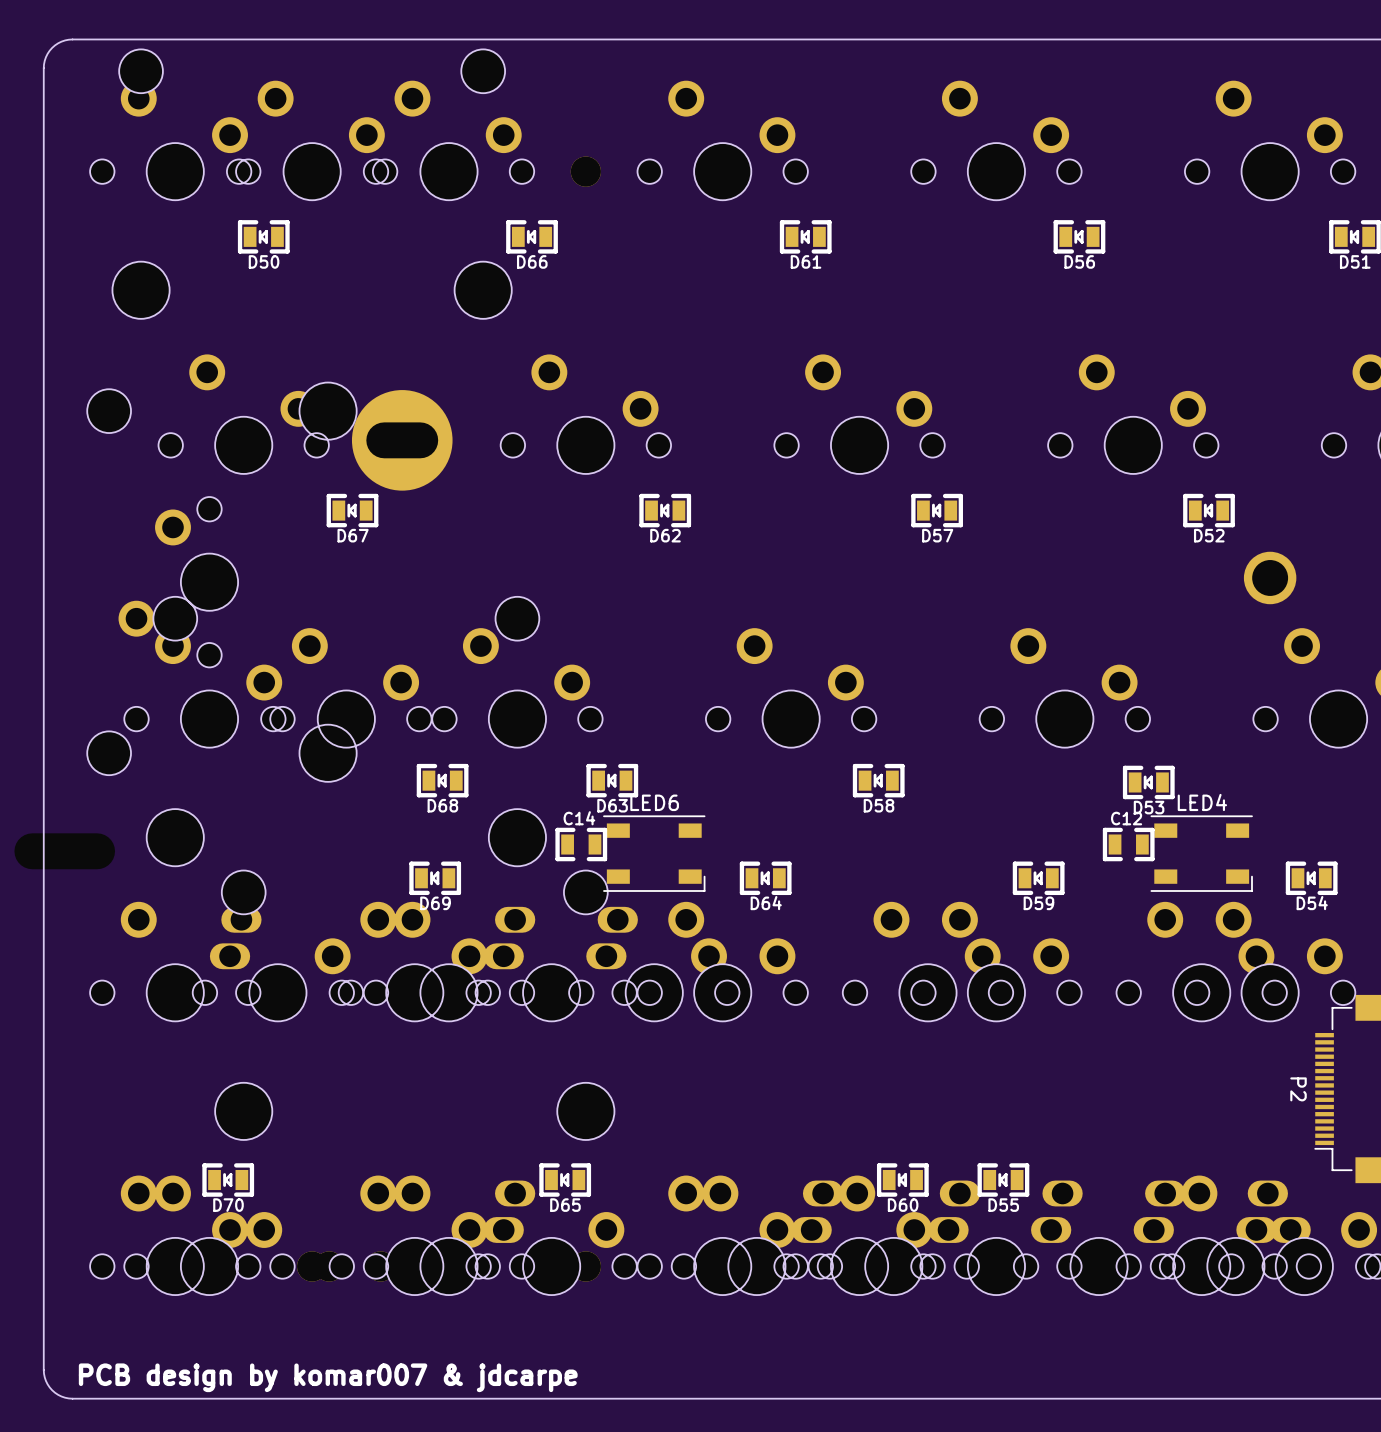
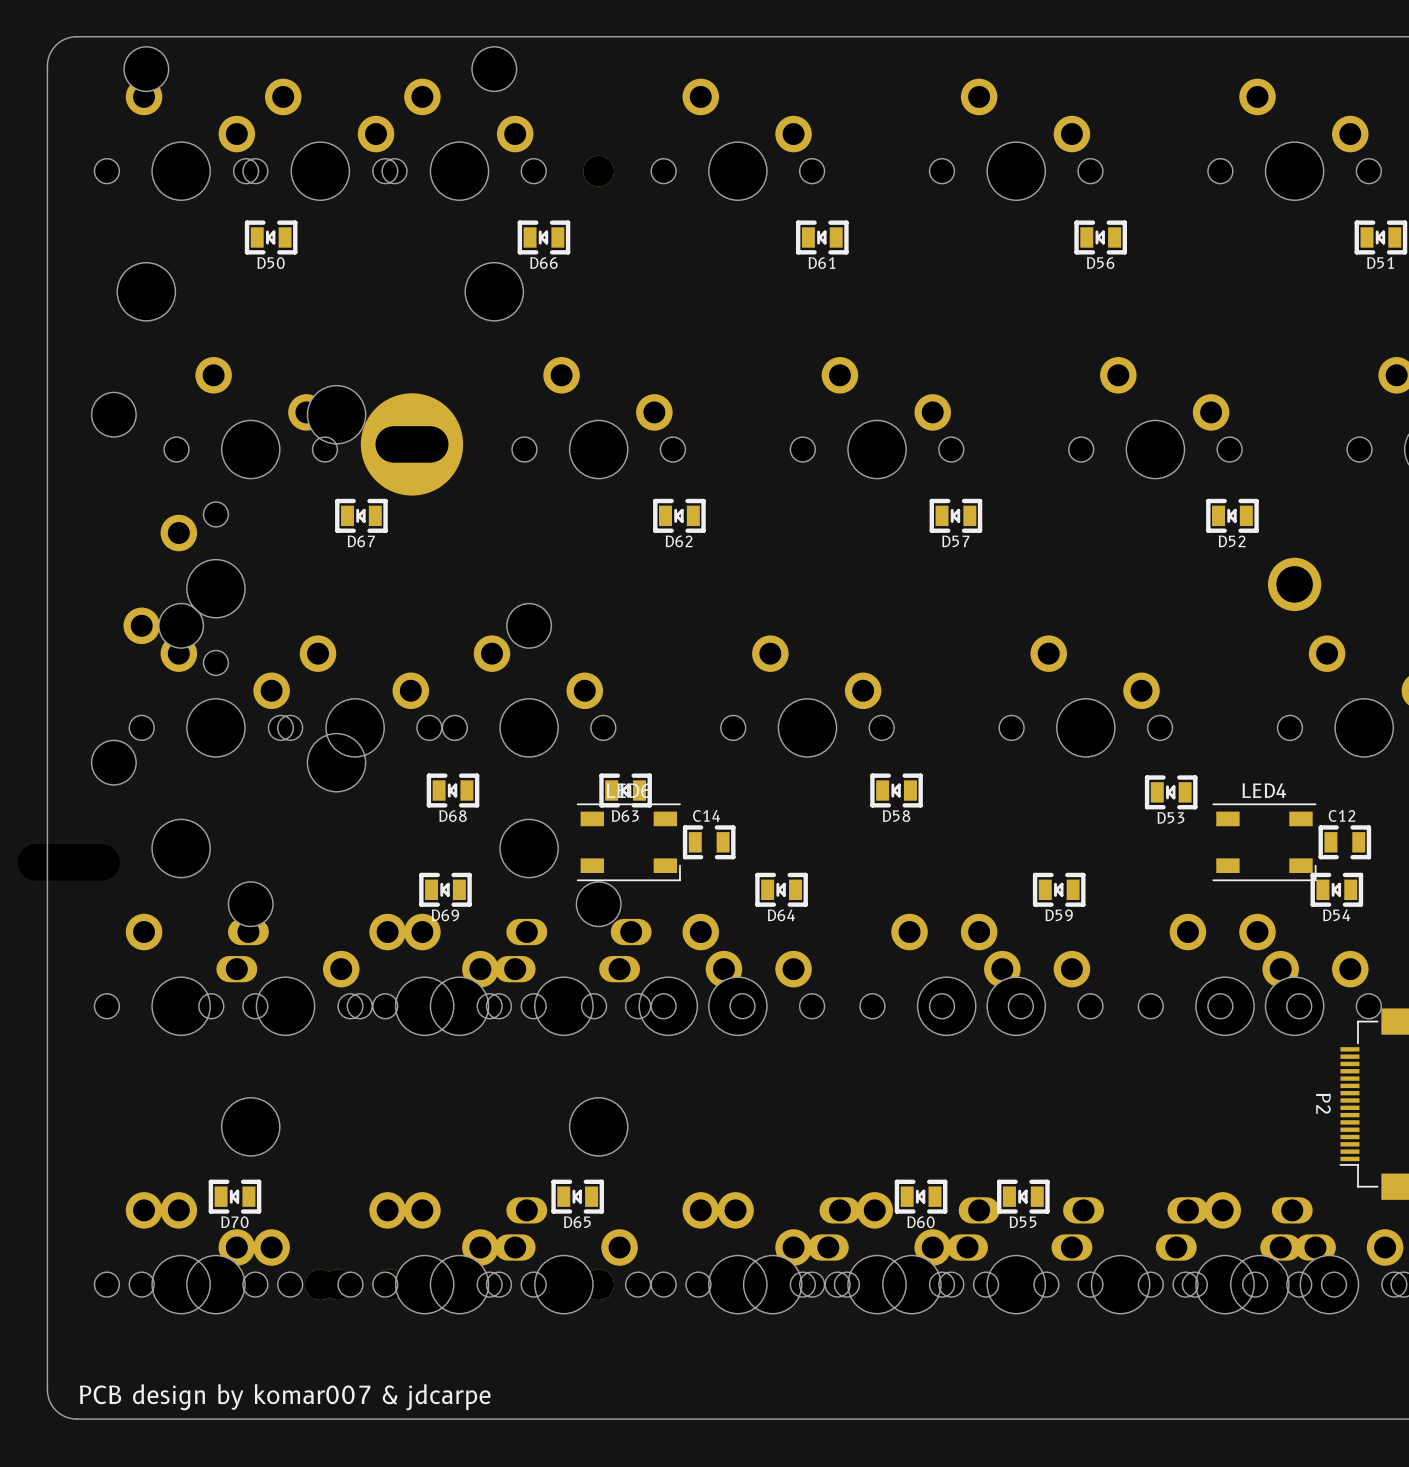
C14 position: (581, 844) -> (709, 842)
C12 position: (1128, 844) -> (1344, 842)
LED6 position: (654, 853) -> (628, 842)
LED4 position: (1201, 853) -> (1264, 842)

